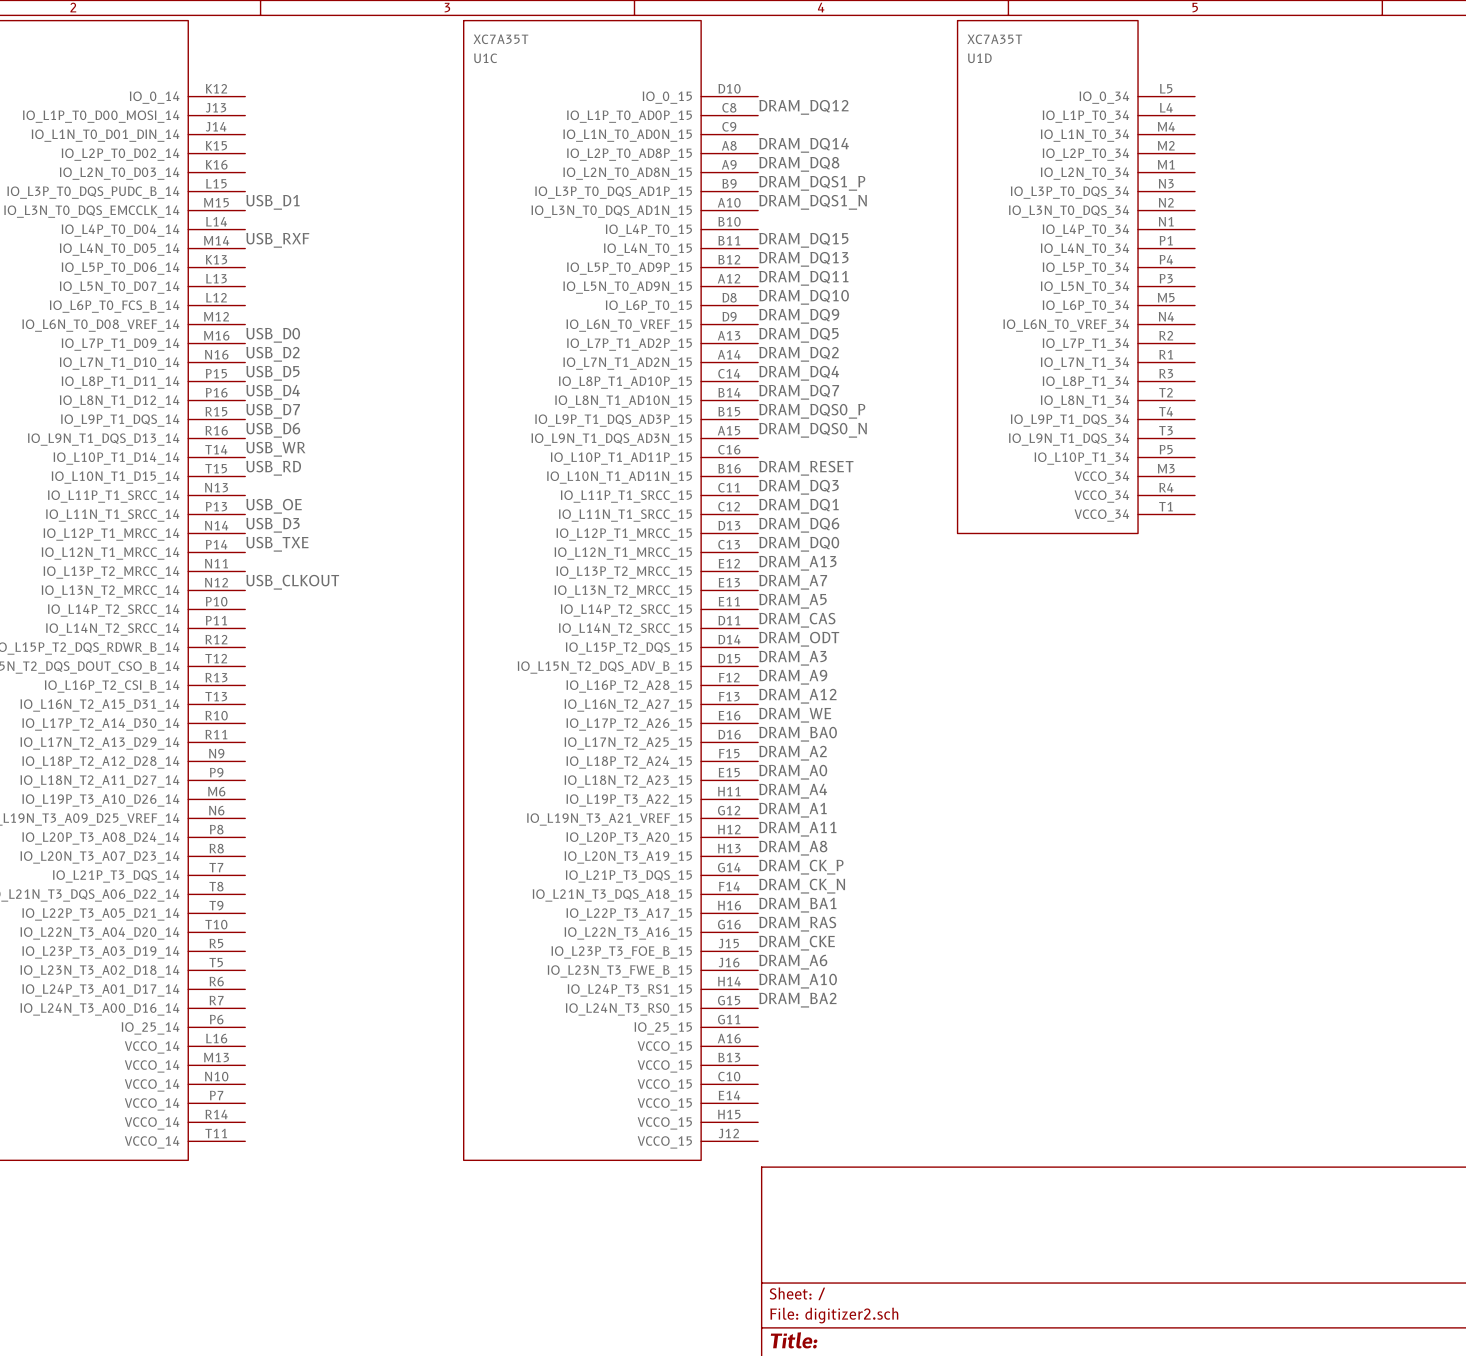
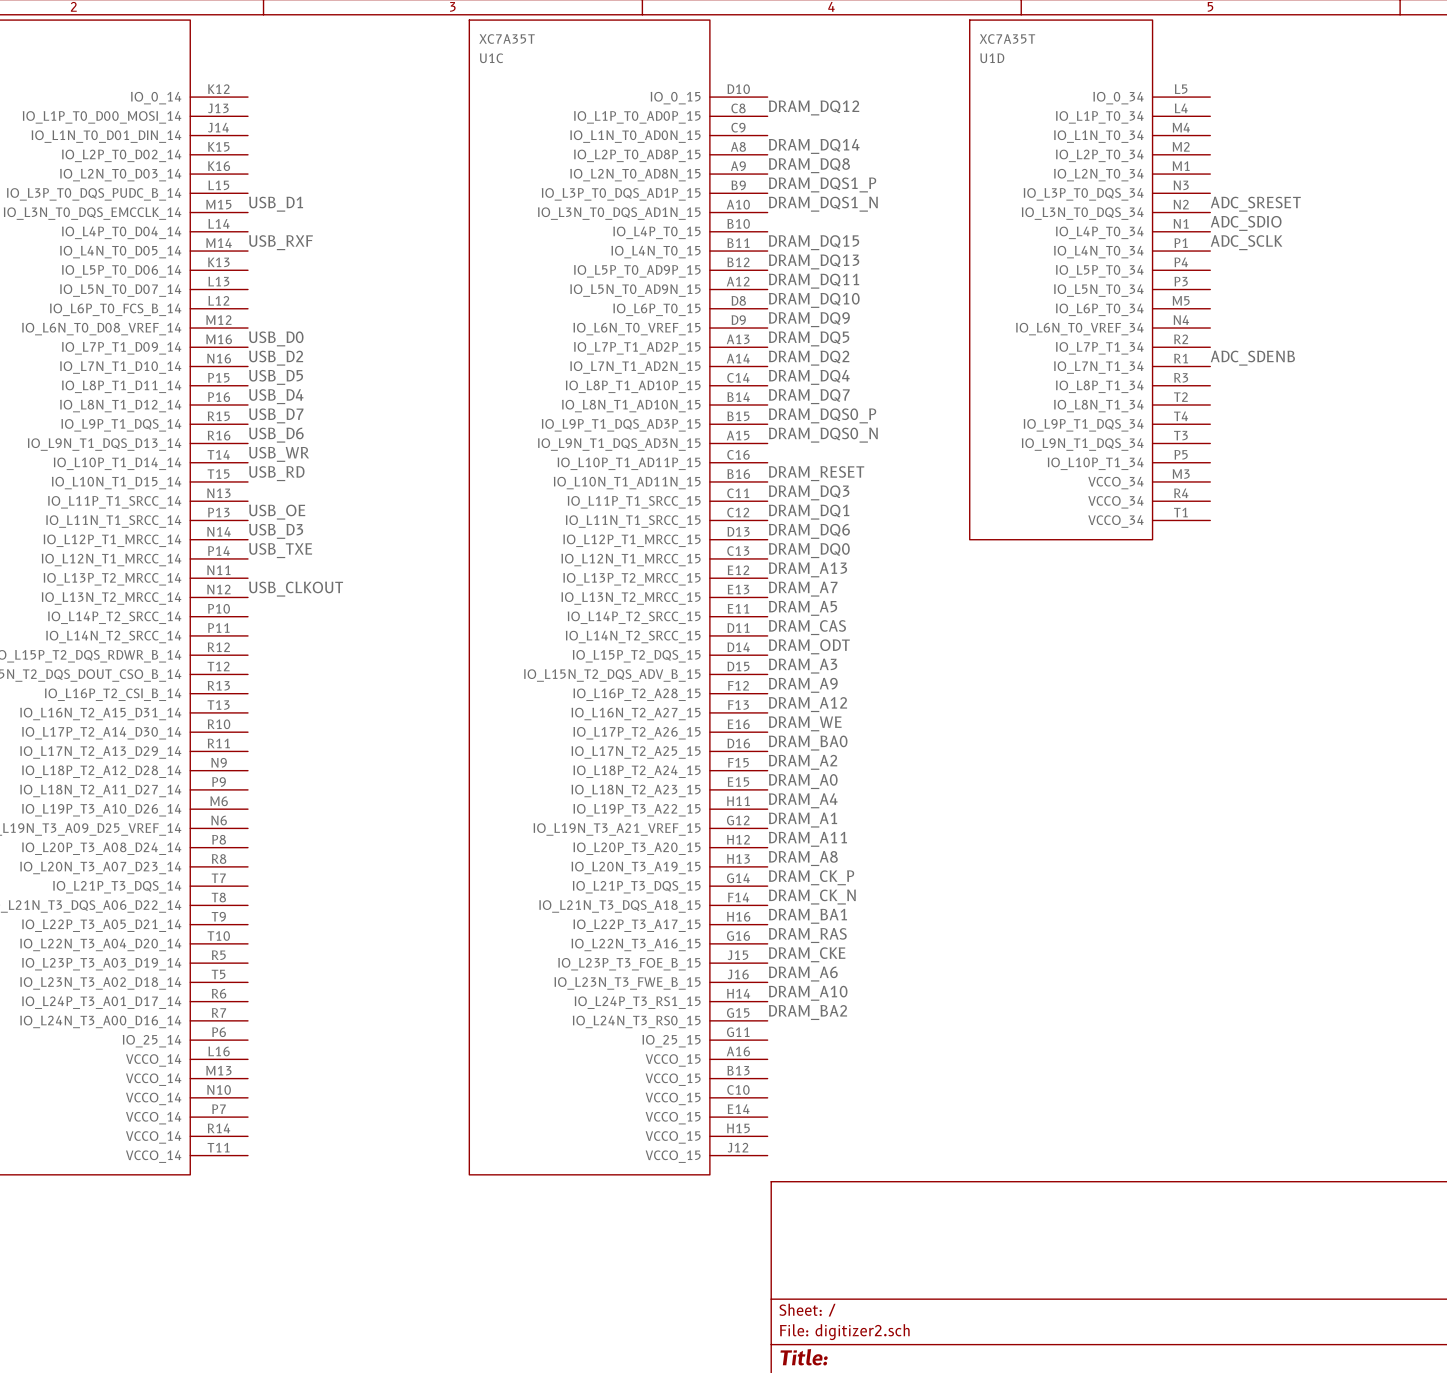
label: none -> ADC_SRESET (1255, 204)
label: none -> ADC_SDIO (1246, 223)
label: none -> ADC_SCLK (1246, 242)
label: none -> ADC_SDENB (1252, 358)

